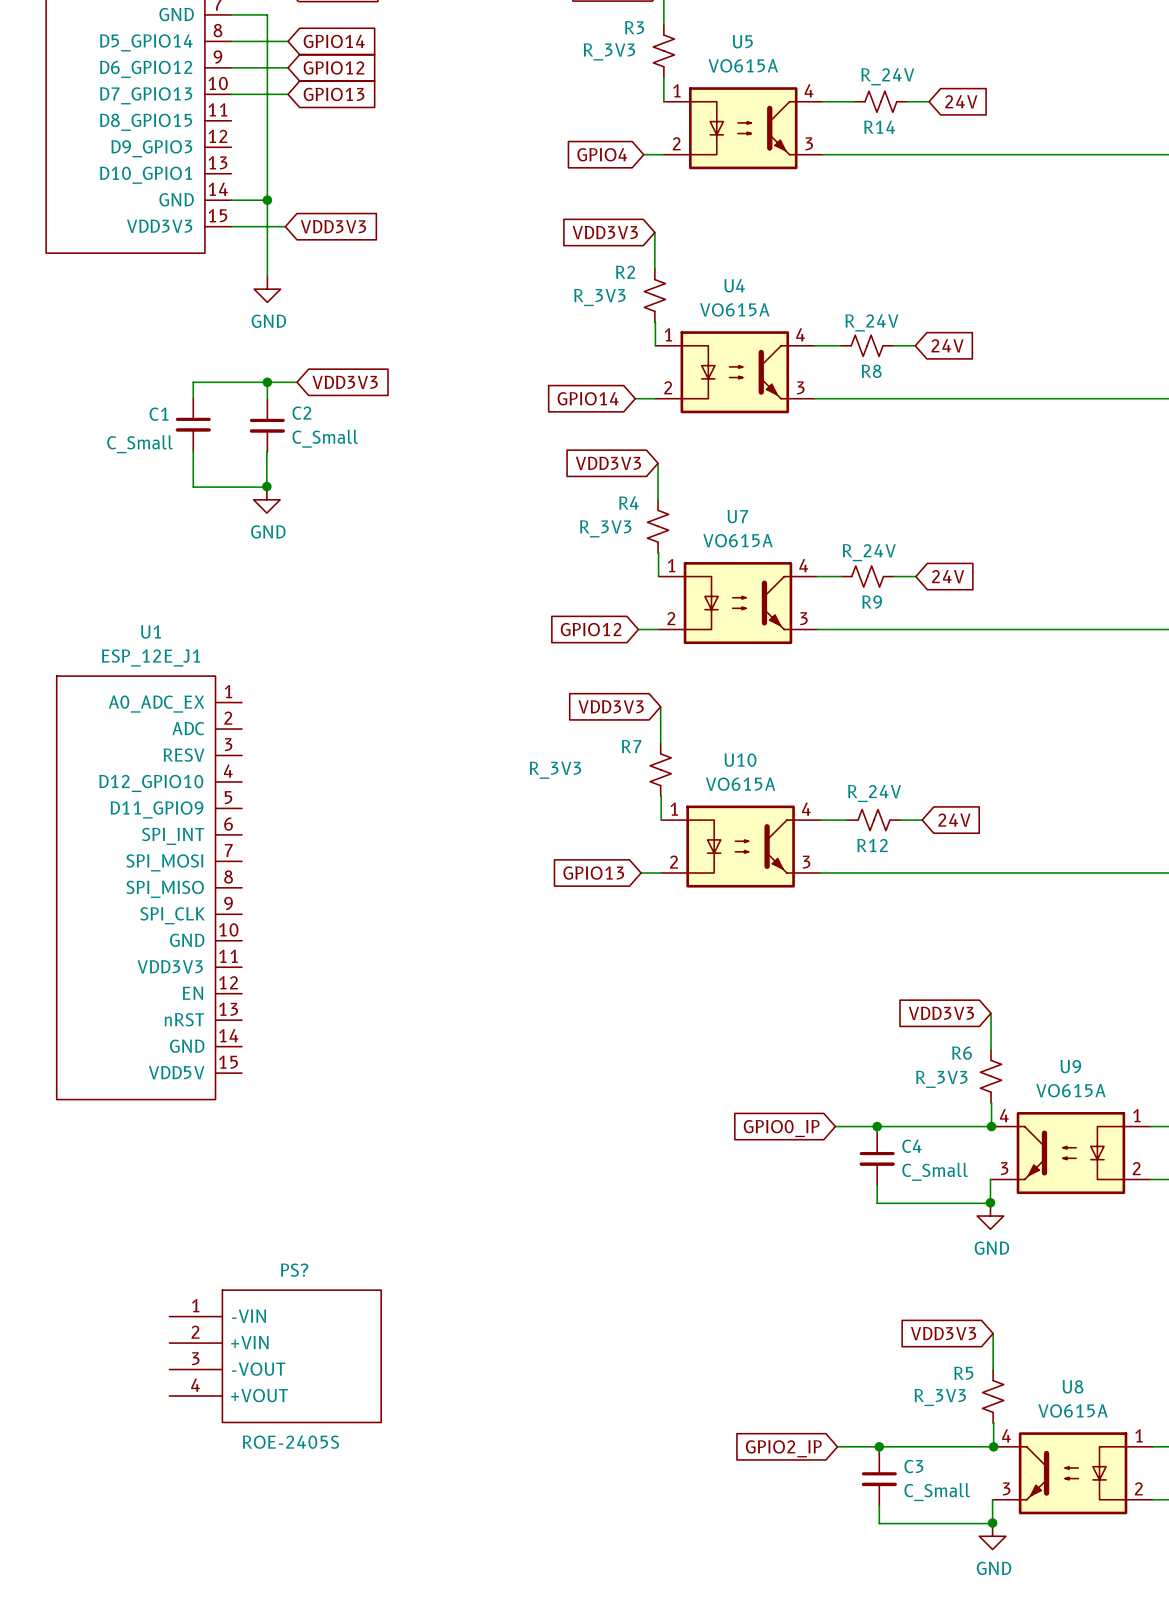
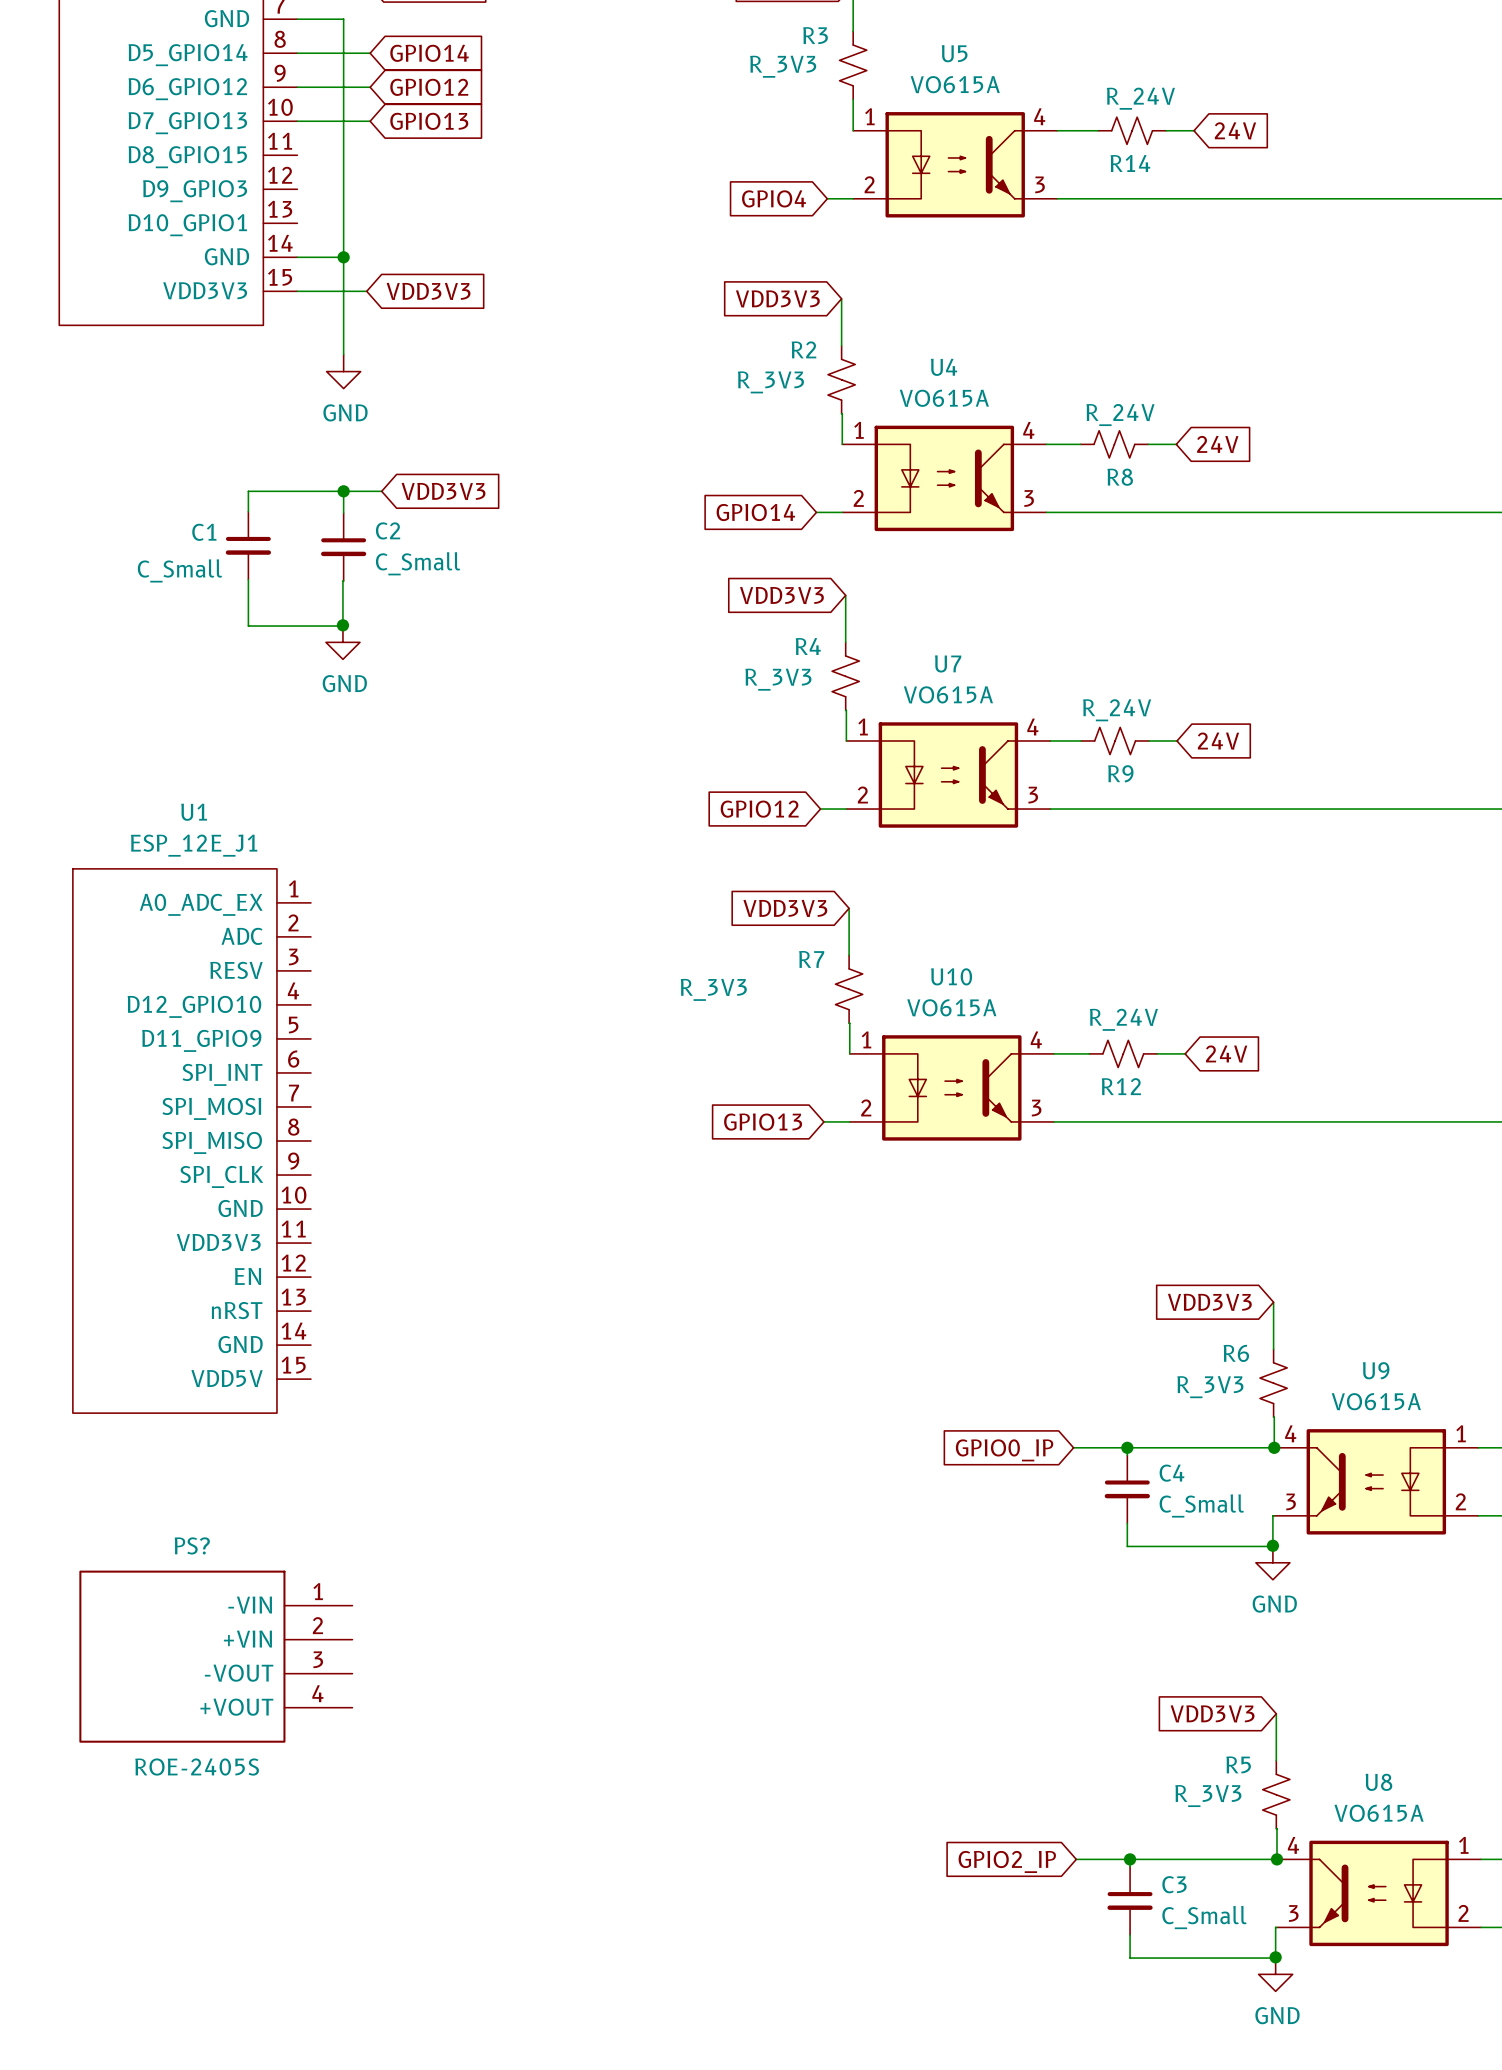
PS?: none -> ROE-2405S (215, 1656)
PS?: ROE-2405S (275, 1356) -> none

